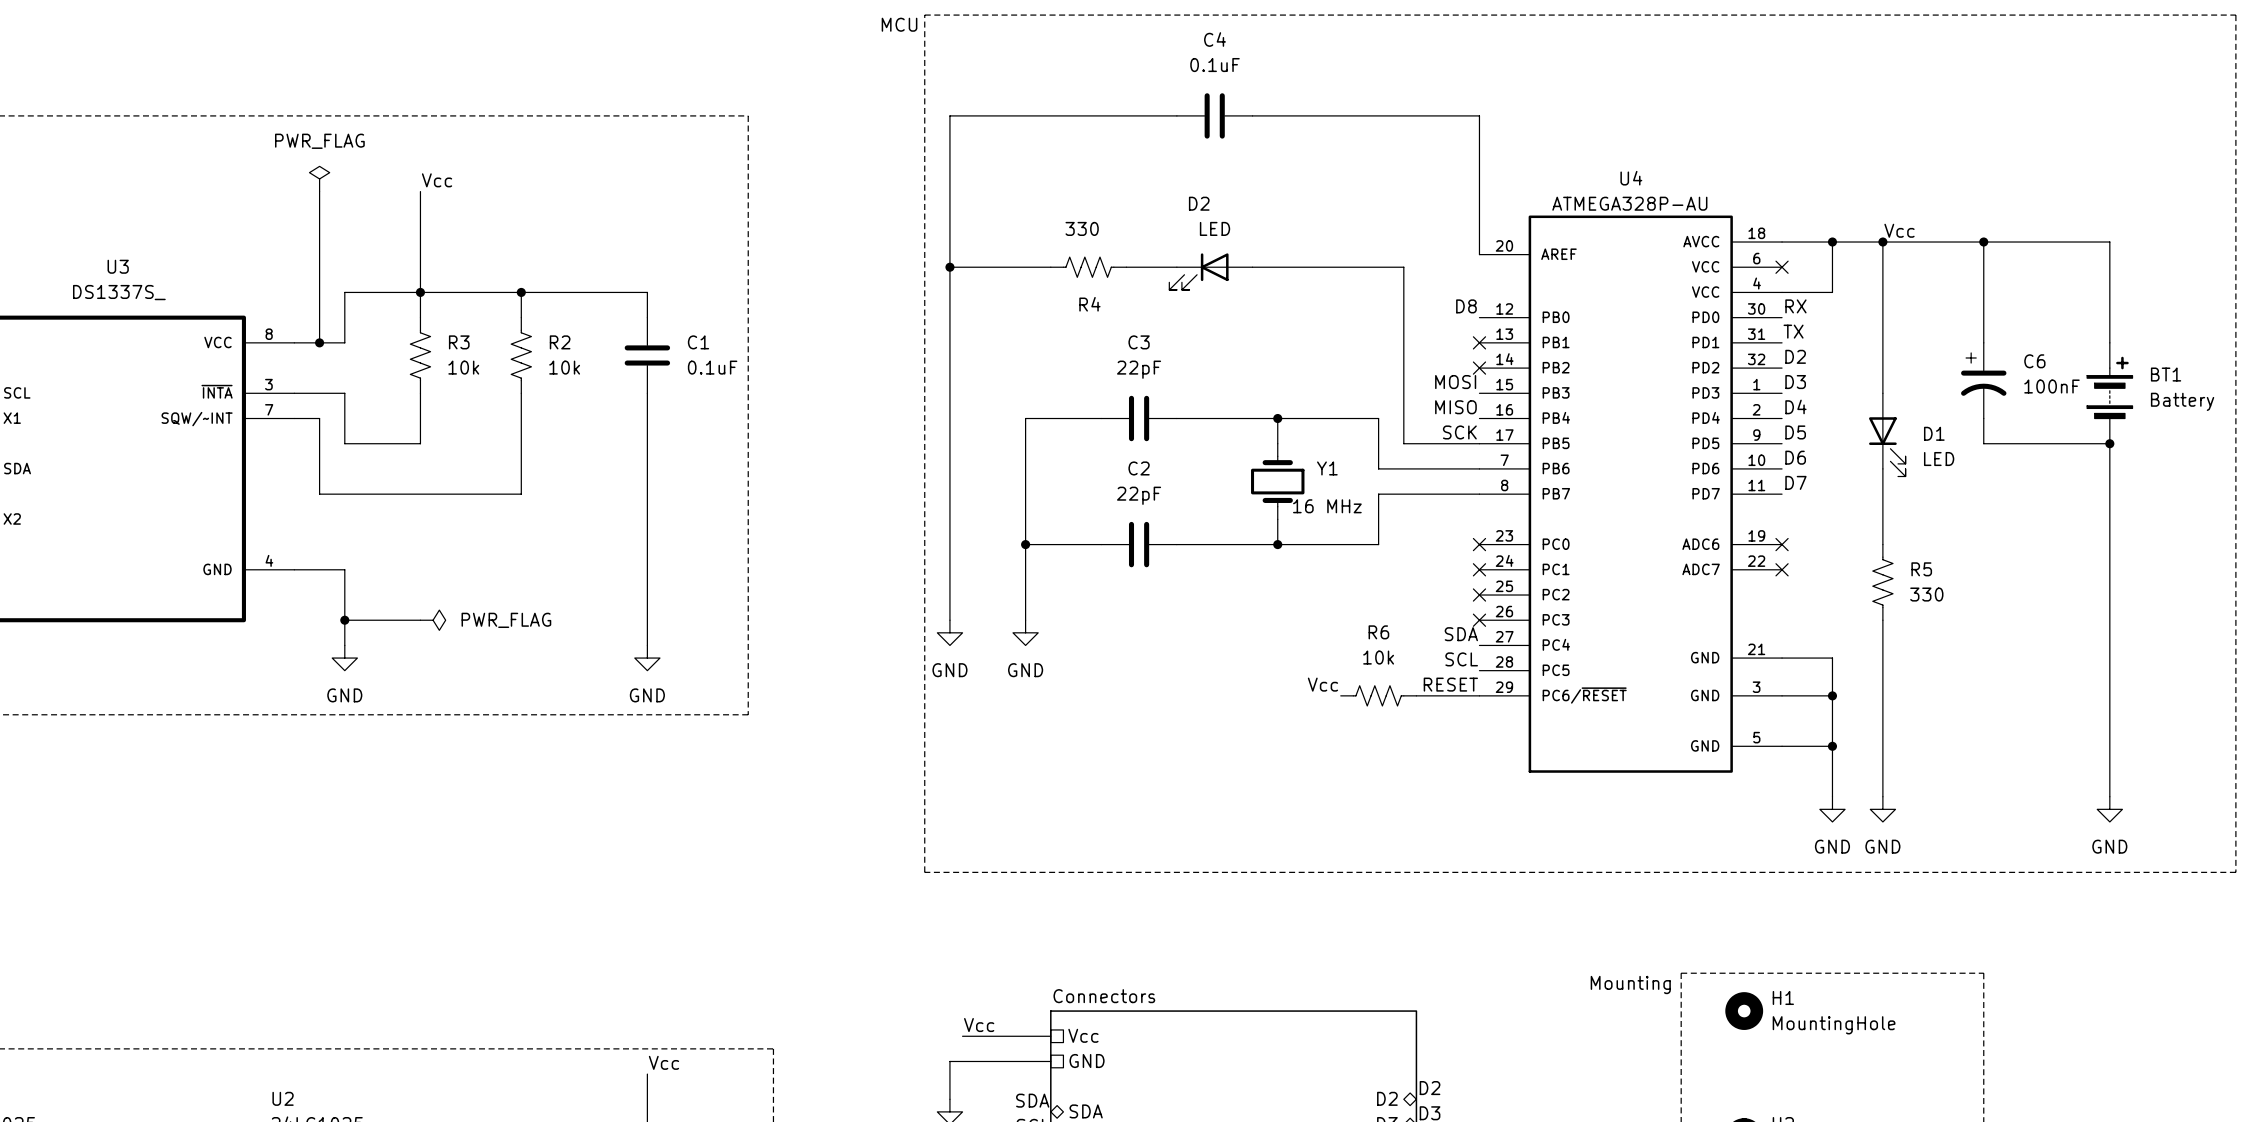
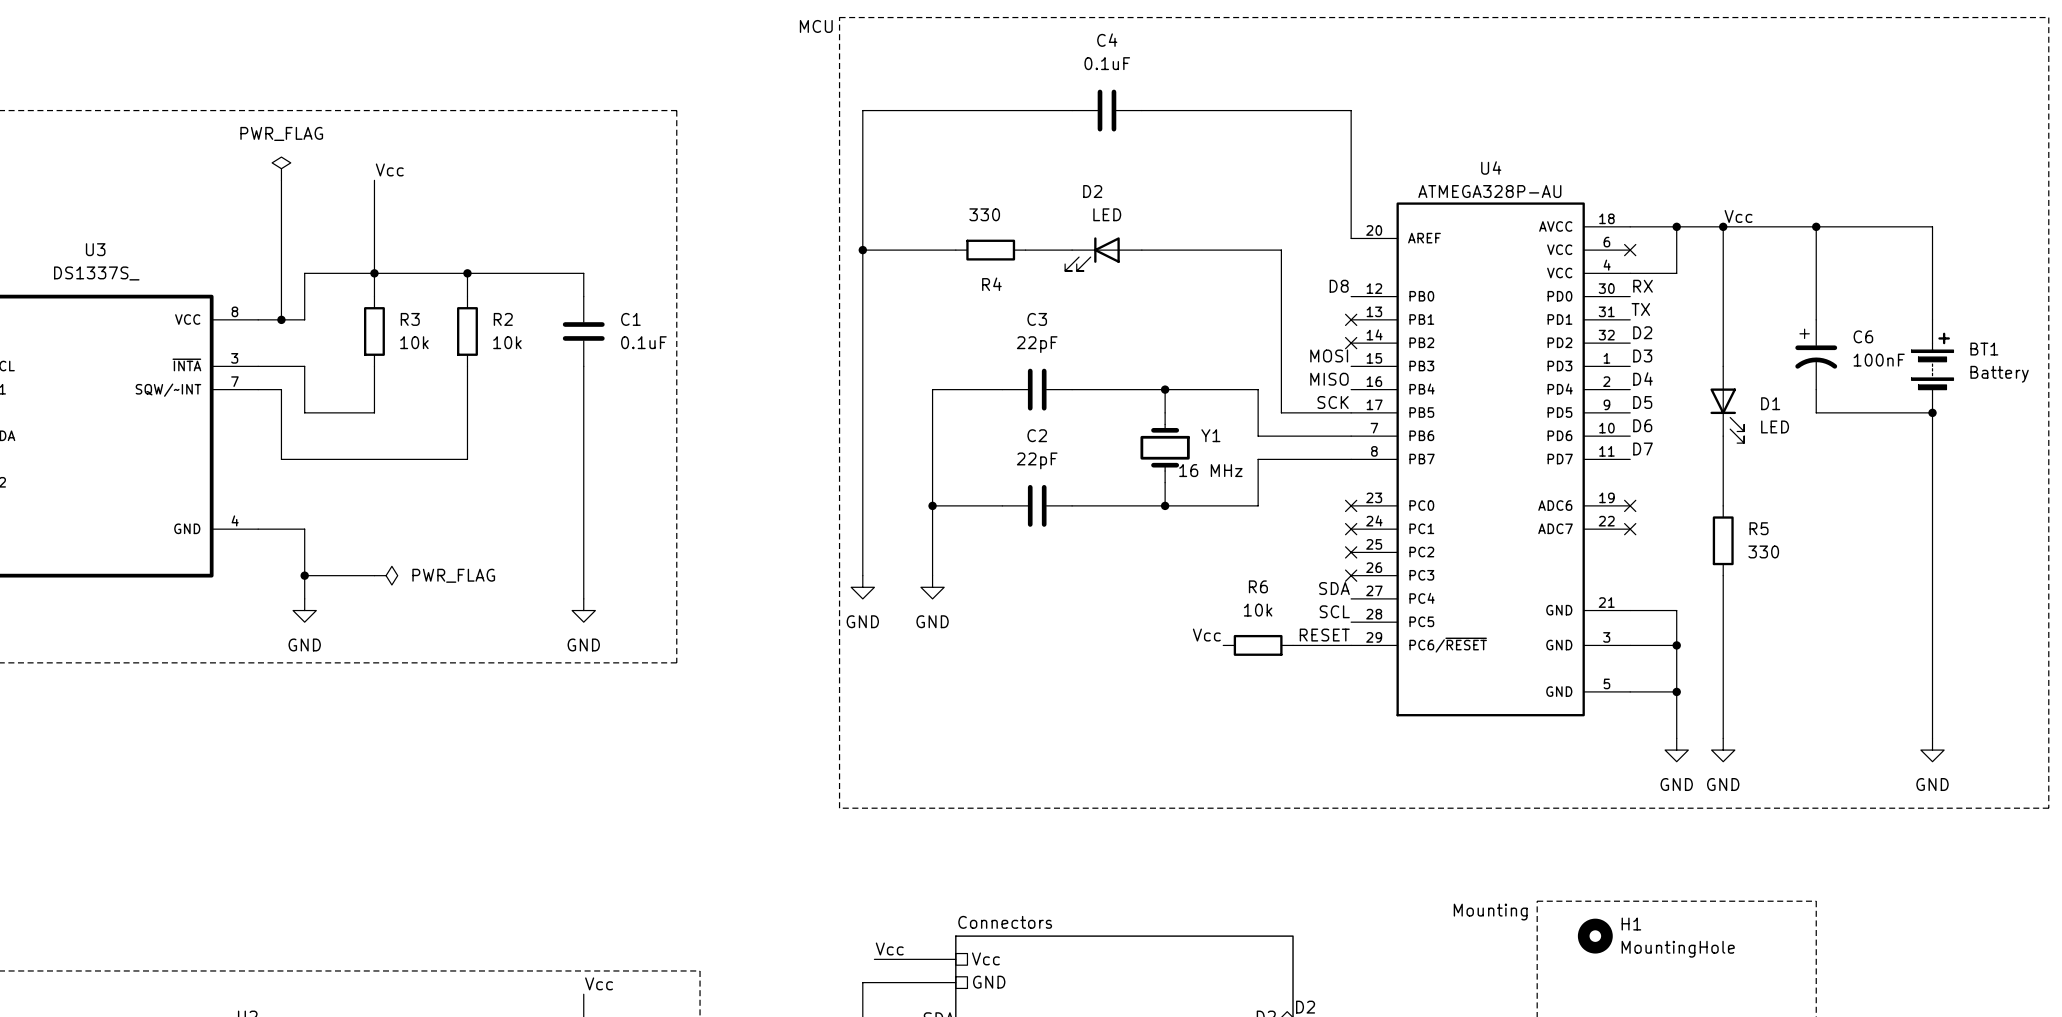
R4 symbol: [1050, 257, 1127, 278] -> [955, 239, 1026, 261]
R3 symbol: [410, 317, 431, 394] -> [363, 296, 385, 367]
R2 symbol: [511, 317, 532, 394] -> [457, 296, 478, 367]
R5 symbol: [1872, 544, 1893, 621] -> [1712, 505, 1734, 576]
R6 symbol: [1340, 685, 1417, 706] -> [1223, 634, 1294, 656]

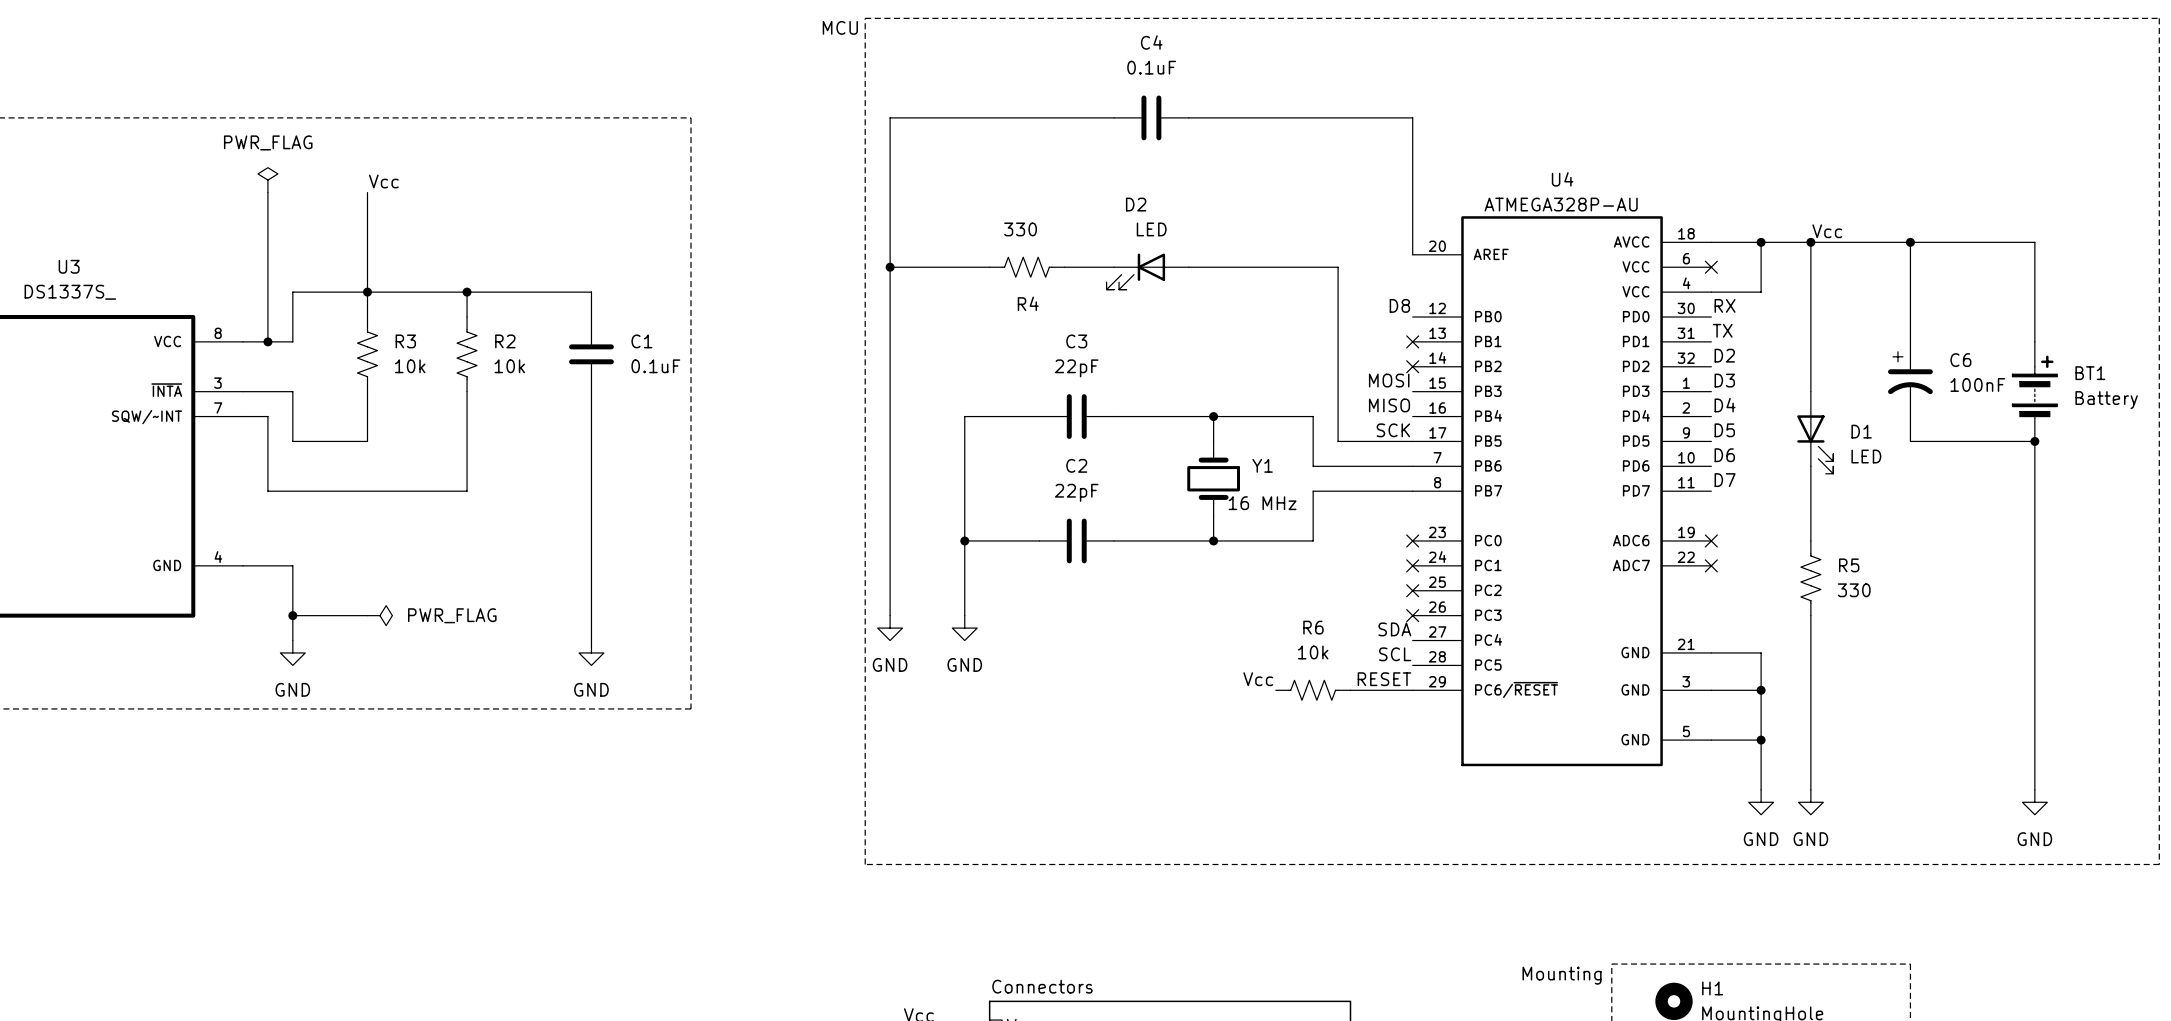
R4 symbol: [955, 239, 1026, 261] -> [989, 257, 1065, 278]
R3 symbol: [363, 296, 385, 367] -> [357, 317, 378, 392]
R2 symbol: [457, 296, 478, 367] -> [457, 317, 477, 392]
R5 symbol: [1712, 505, 1734, 576] -> [1800, 540, 1821, 616]
R6 symbol: [1223, 634, 1294, 656] -> [1275, 680, 1351, 701]

